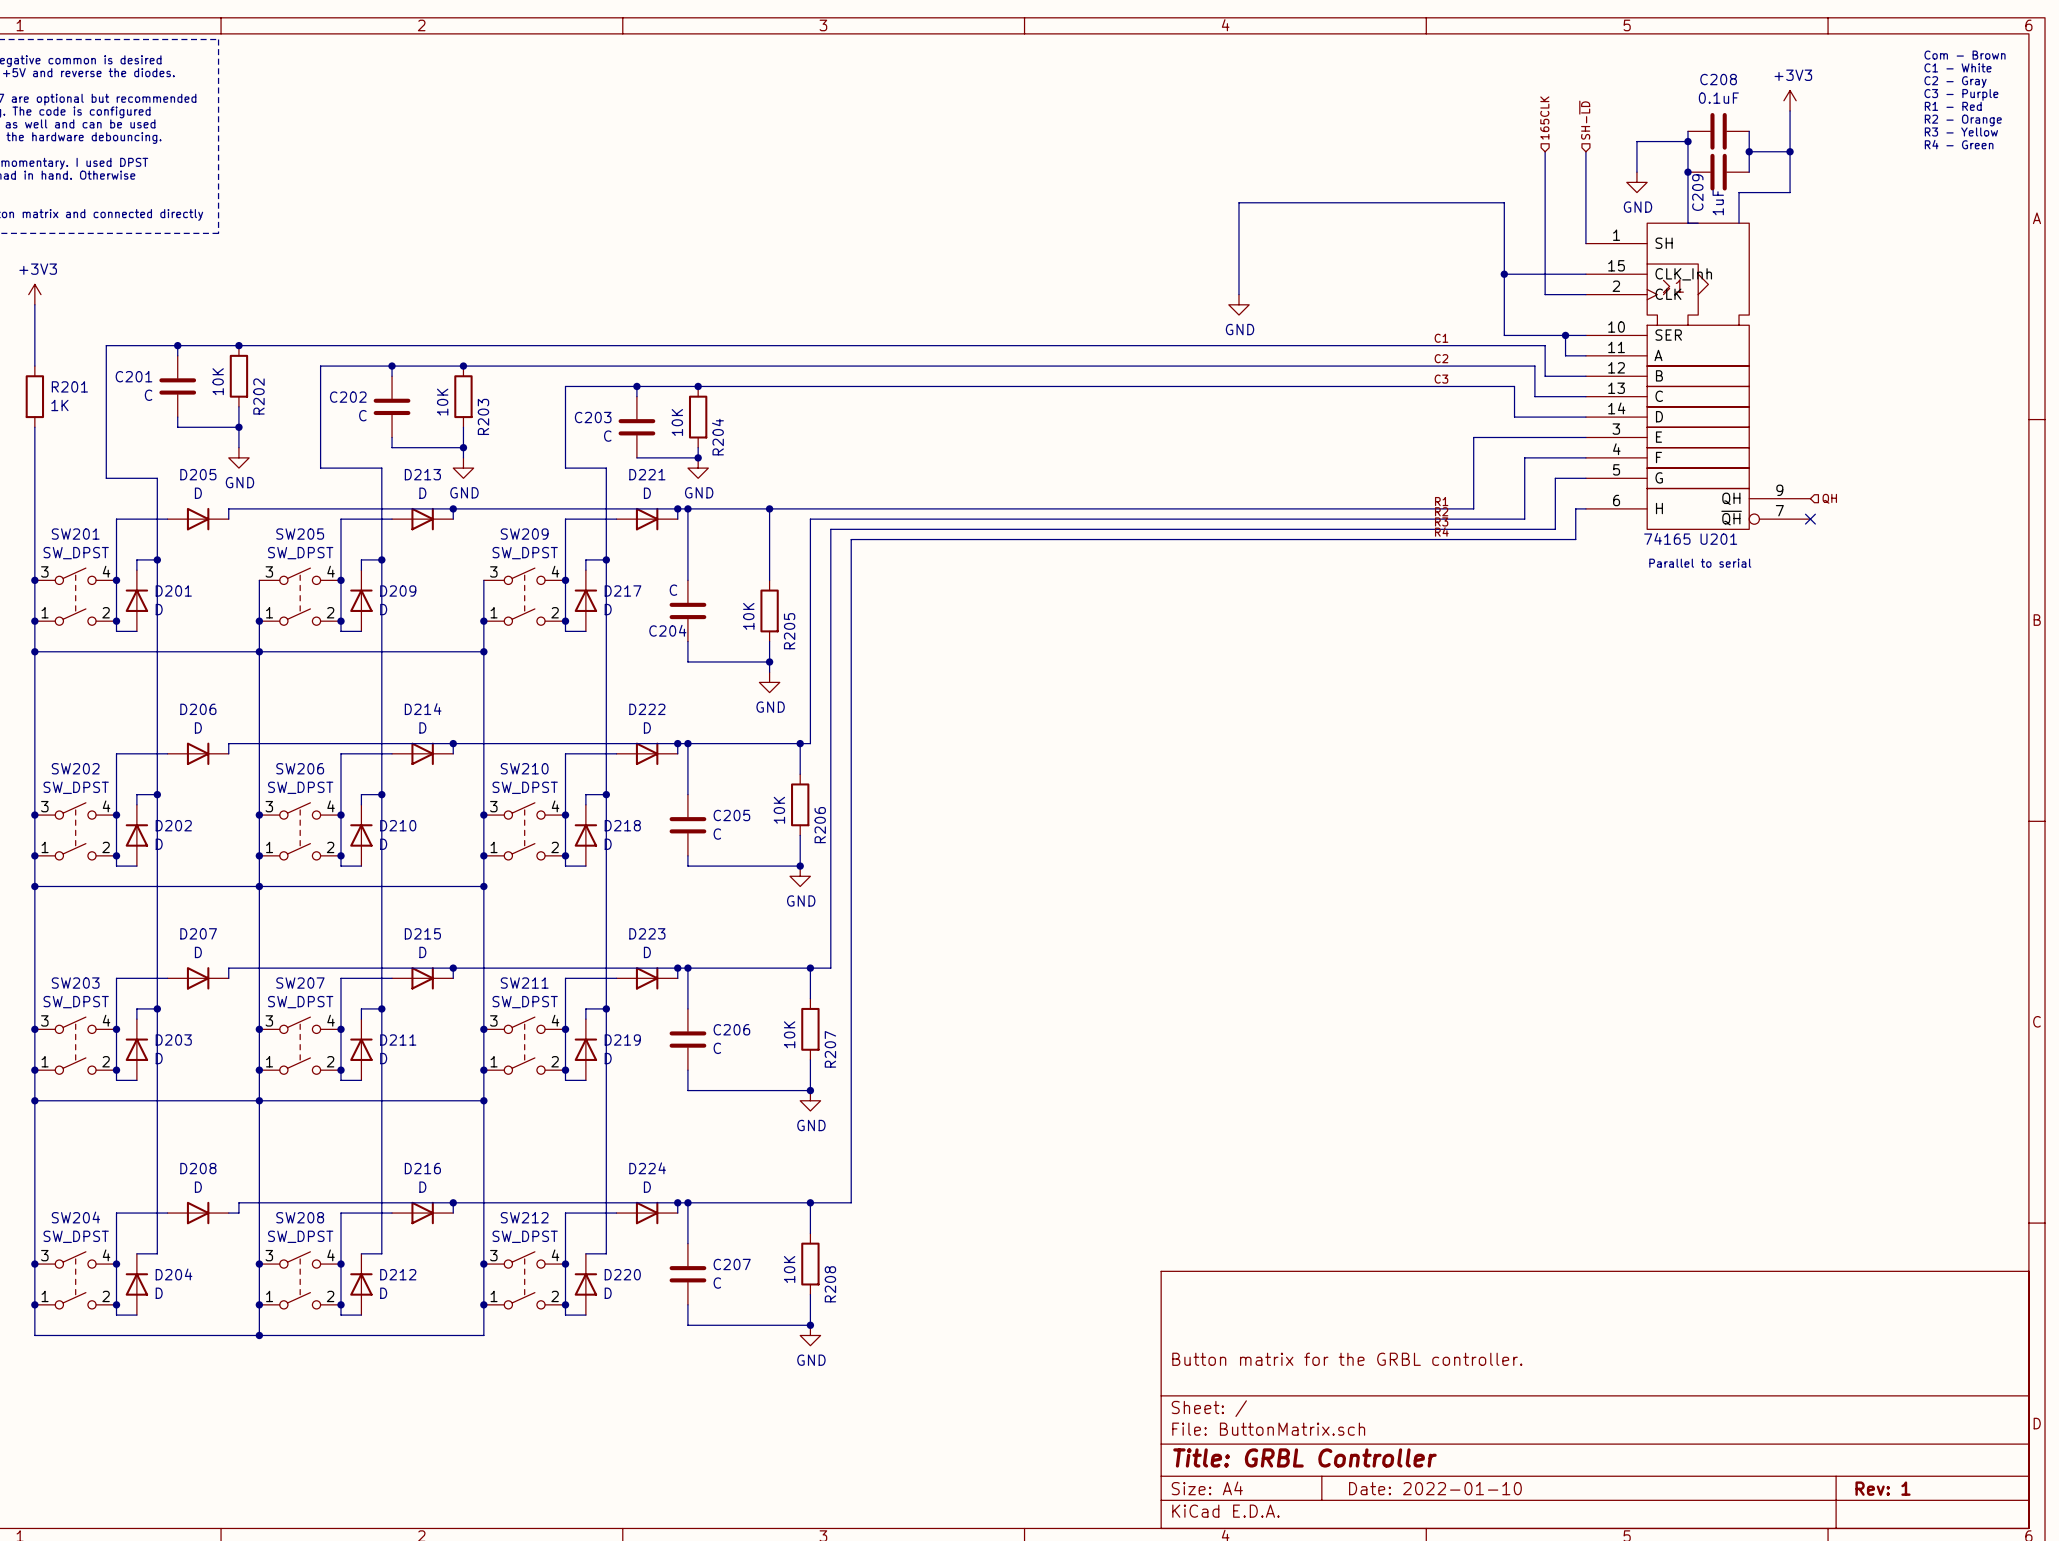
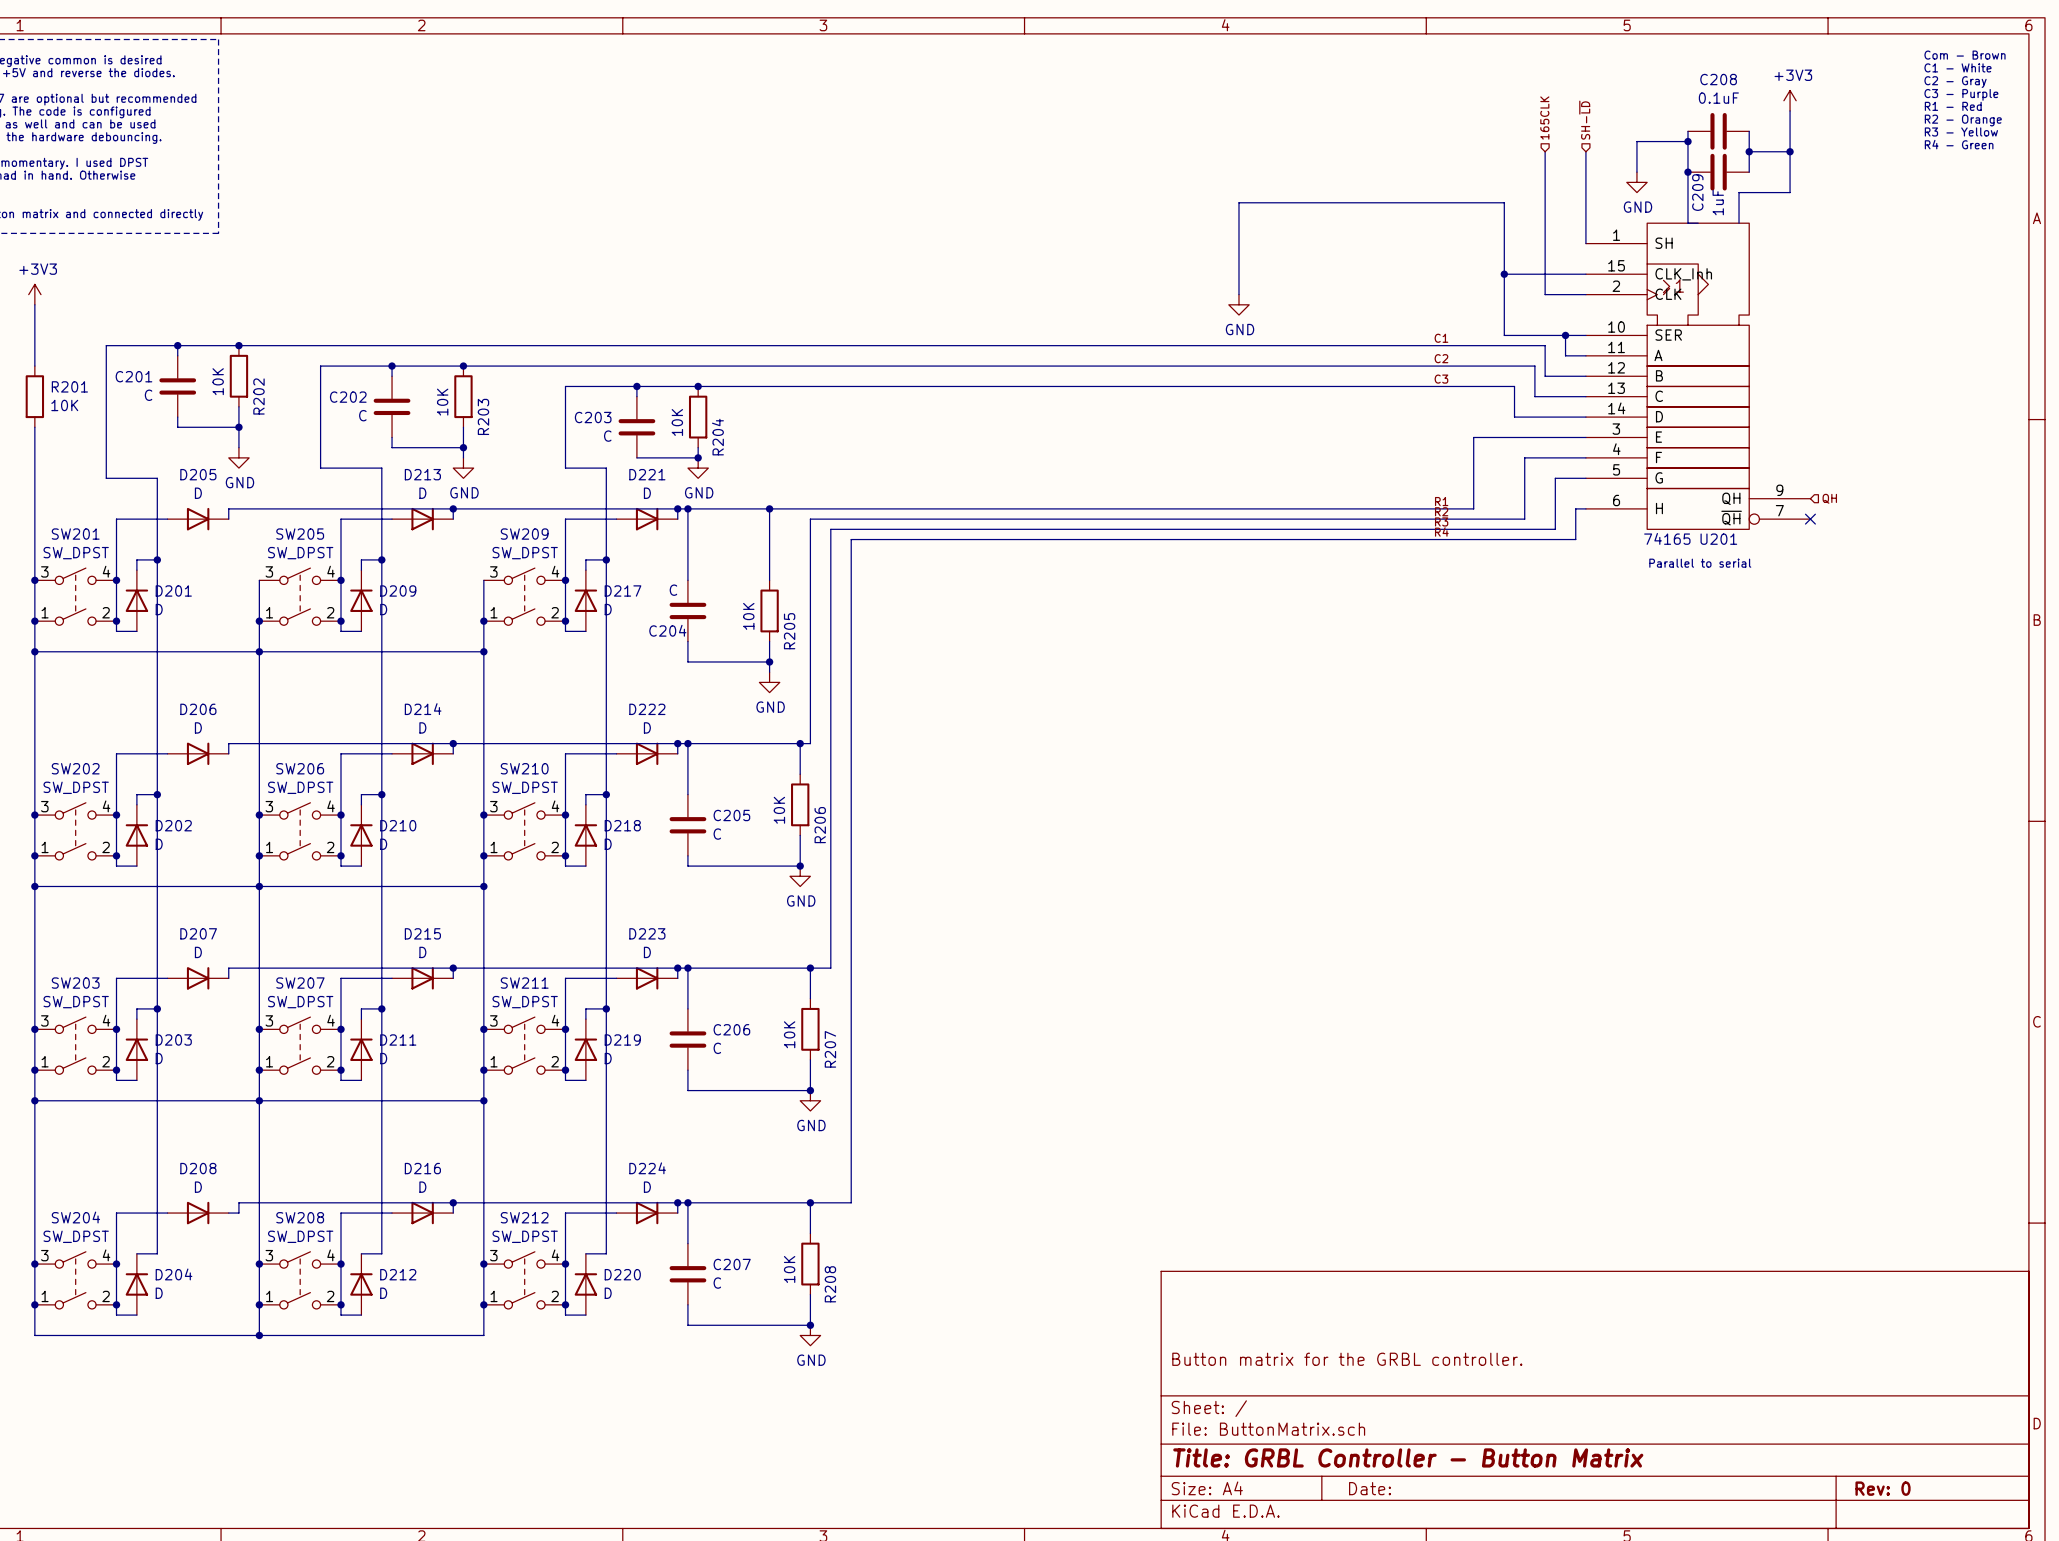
R201 value: 1K (59, 405) -> 10K (64, 405)
title block: Title: GRBL Controller (1304, 1457) -> Title: GRBL Controller - Button Matrix (1408, 1457)
title block: Date: 2022-01-10 (1435, 1488) -> Date: (1370, 1488)
title block: Rev: 1 (1883, 1488) -> Rev: 0 (1883, 1488)

